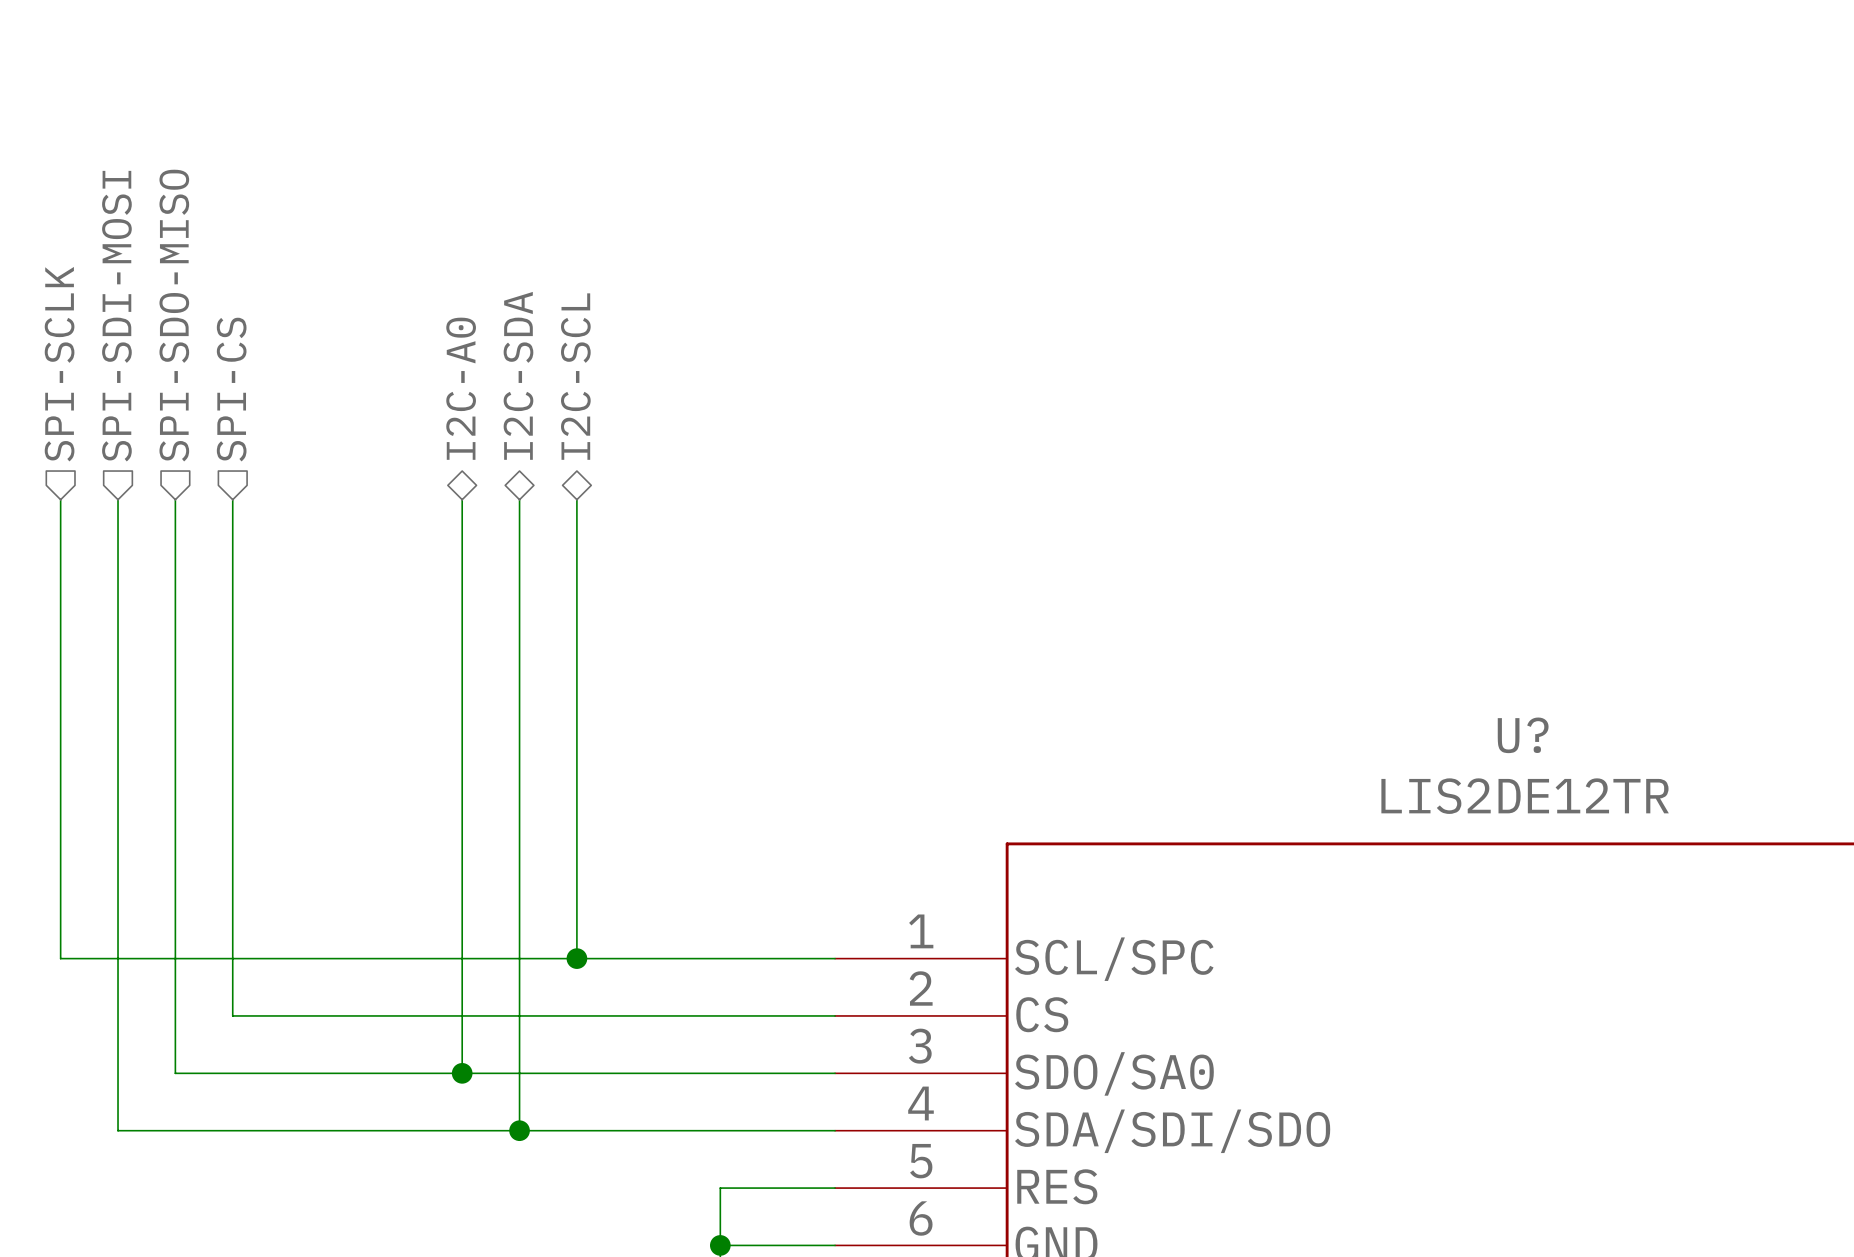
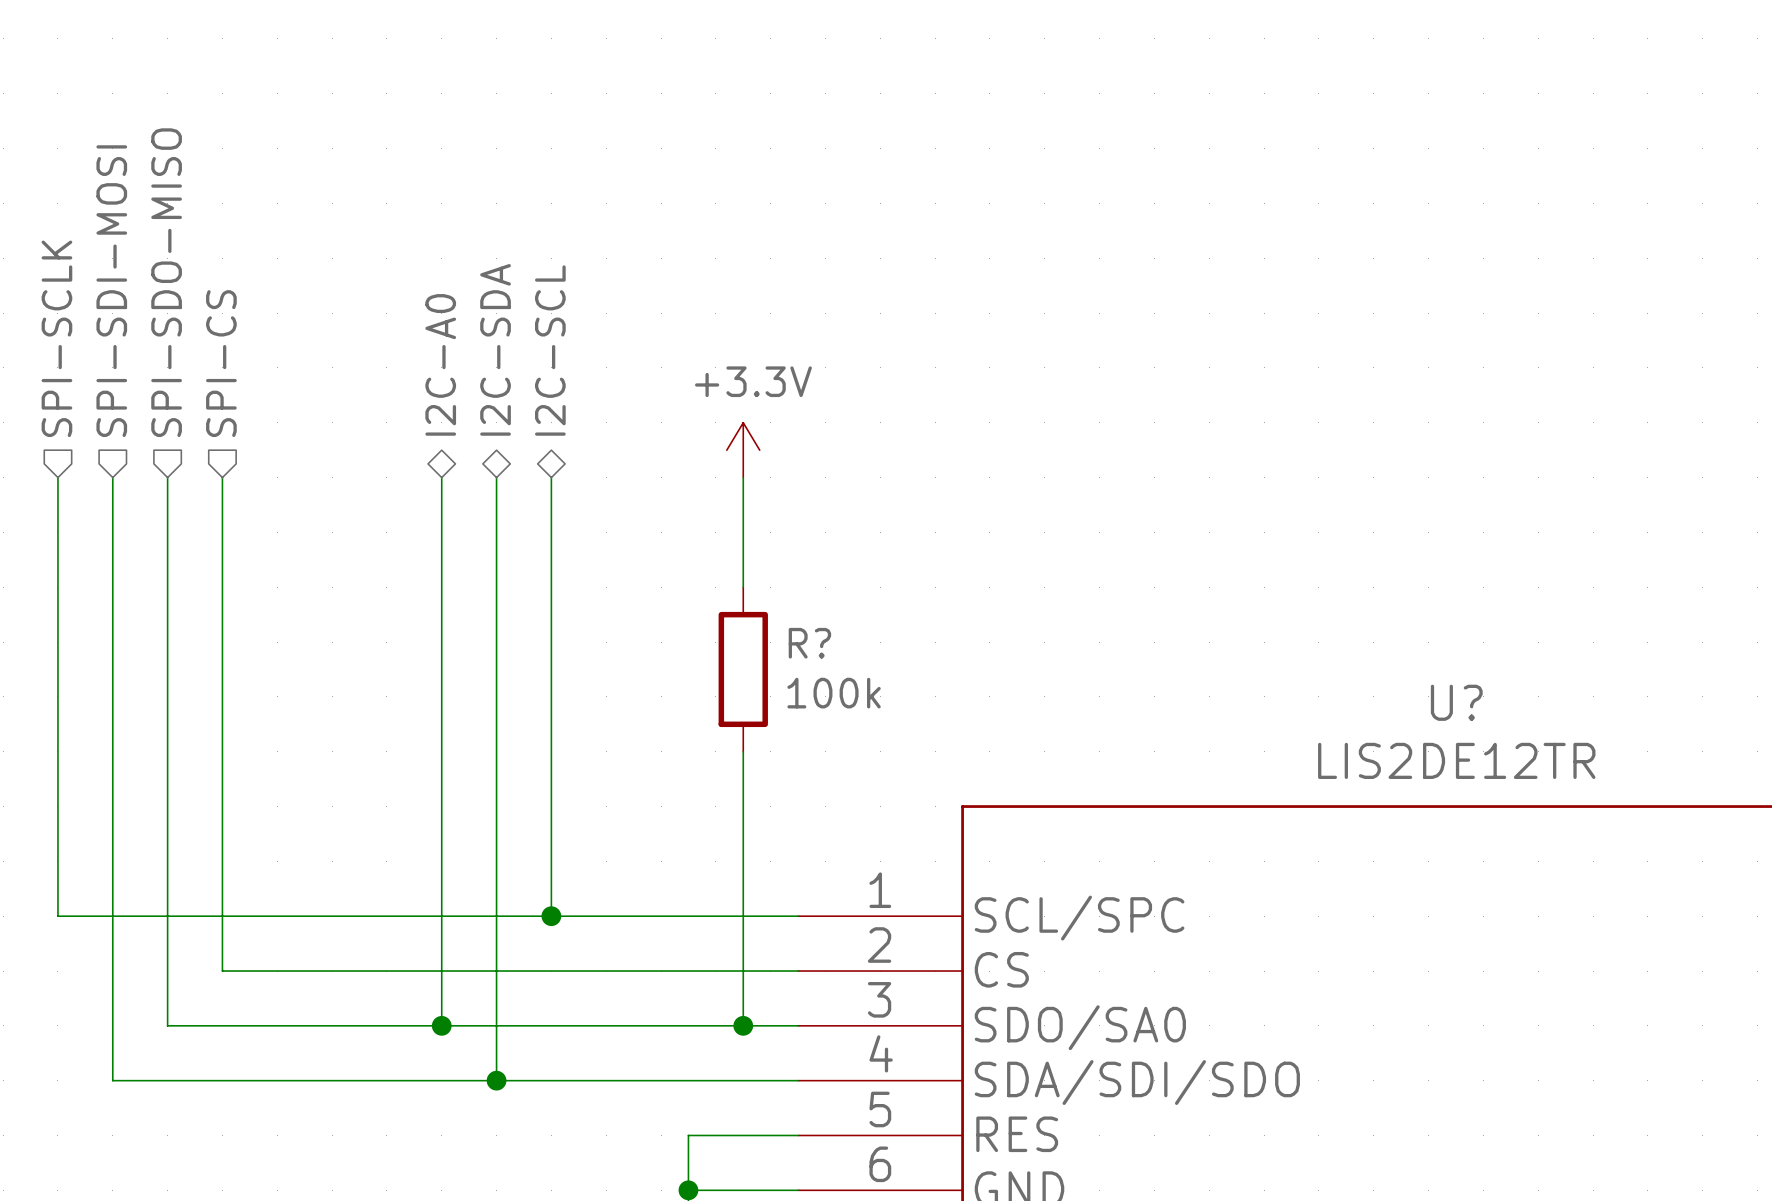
power symbol: none -> +3.3V (743, 450)
wire: none -> (743, 477) (743, 587)
R?: none -> 100k (743, 669)
wire: none -> (743, 751) (743, 1025)
junction: none -> (743, 1025)

